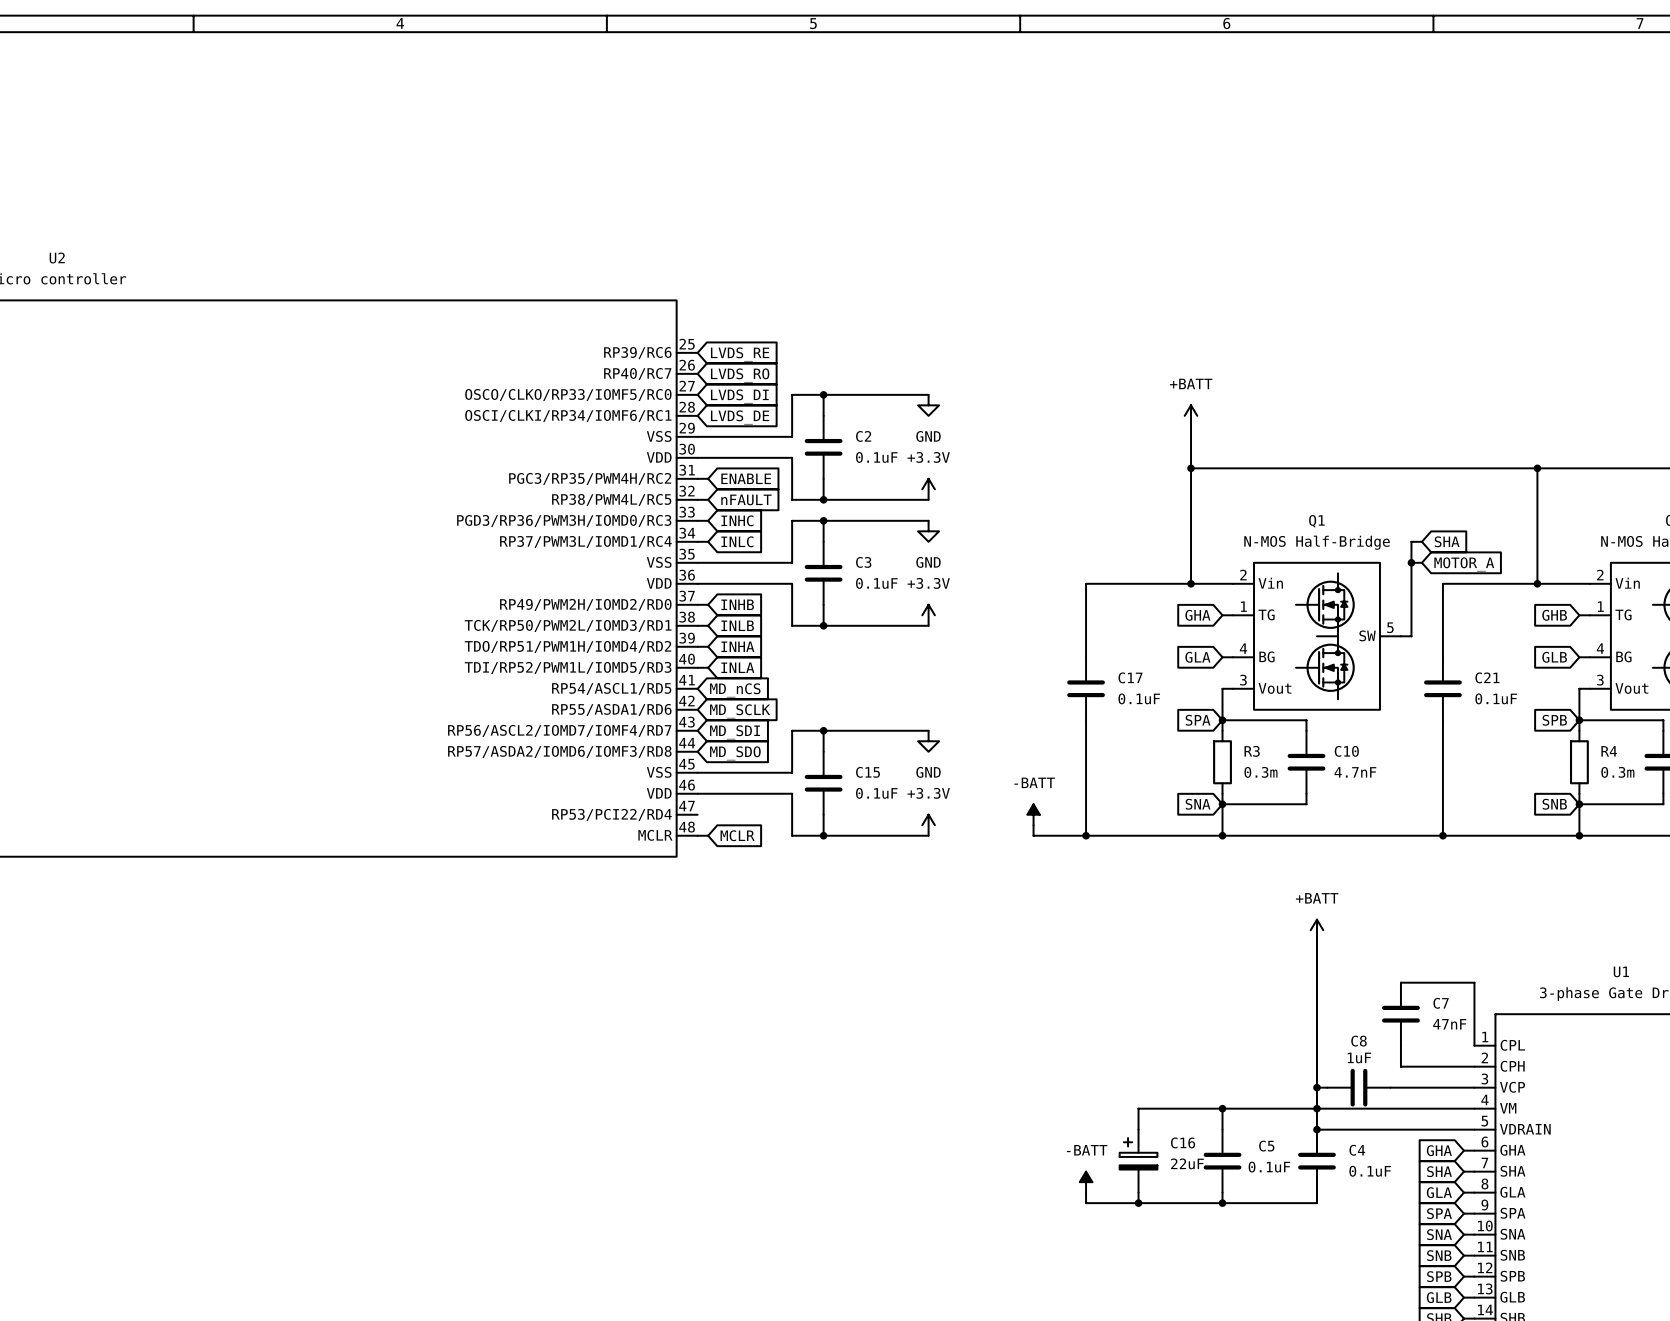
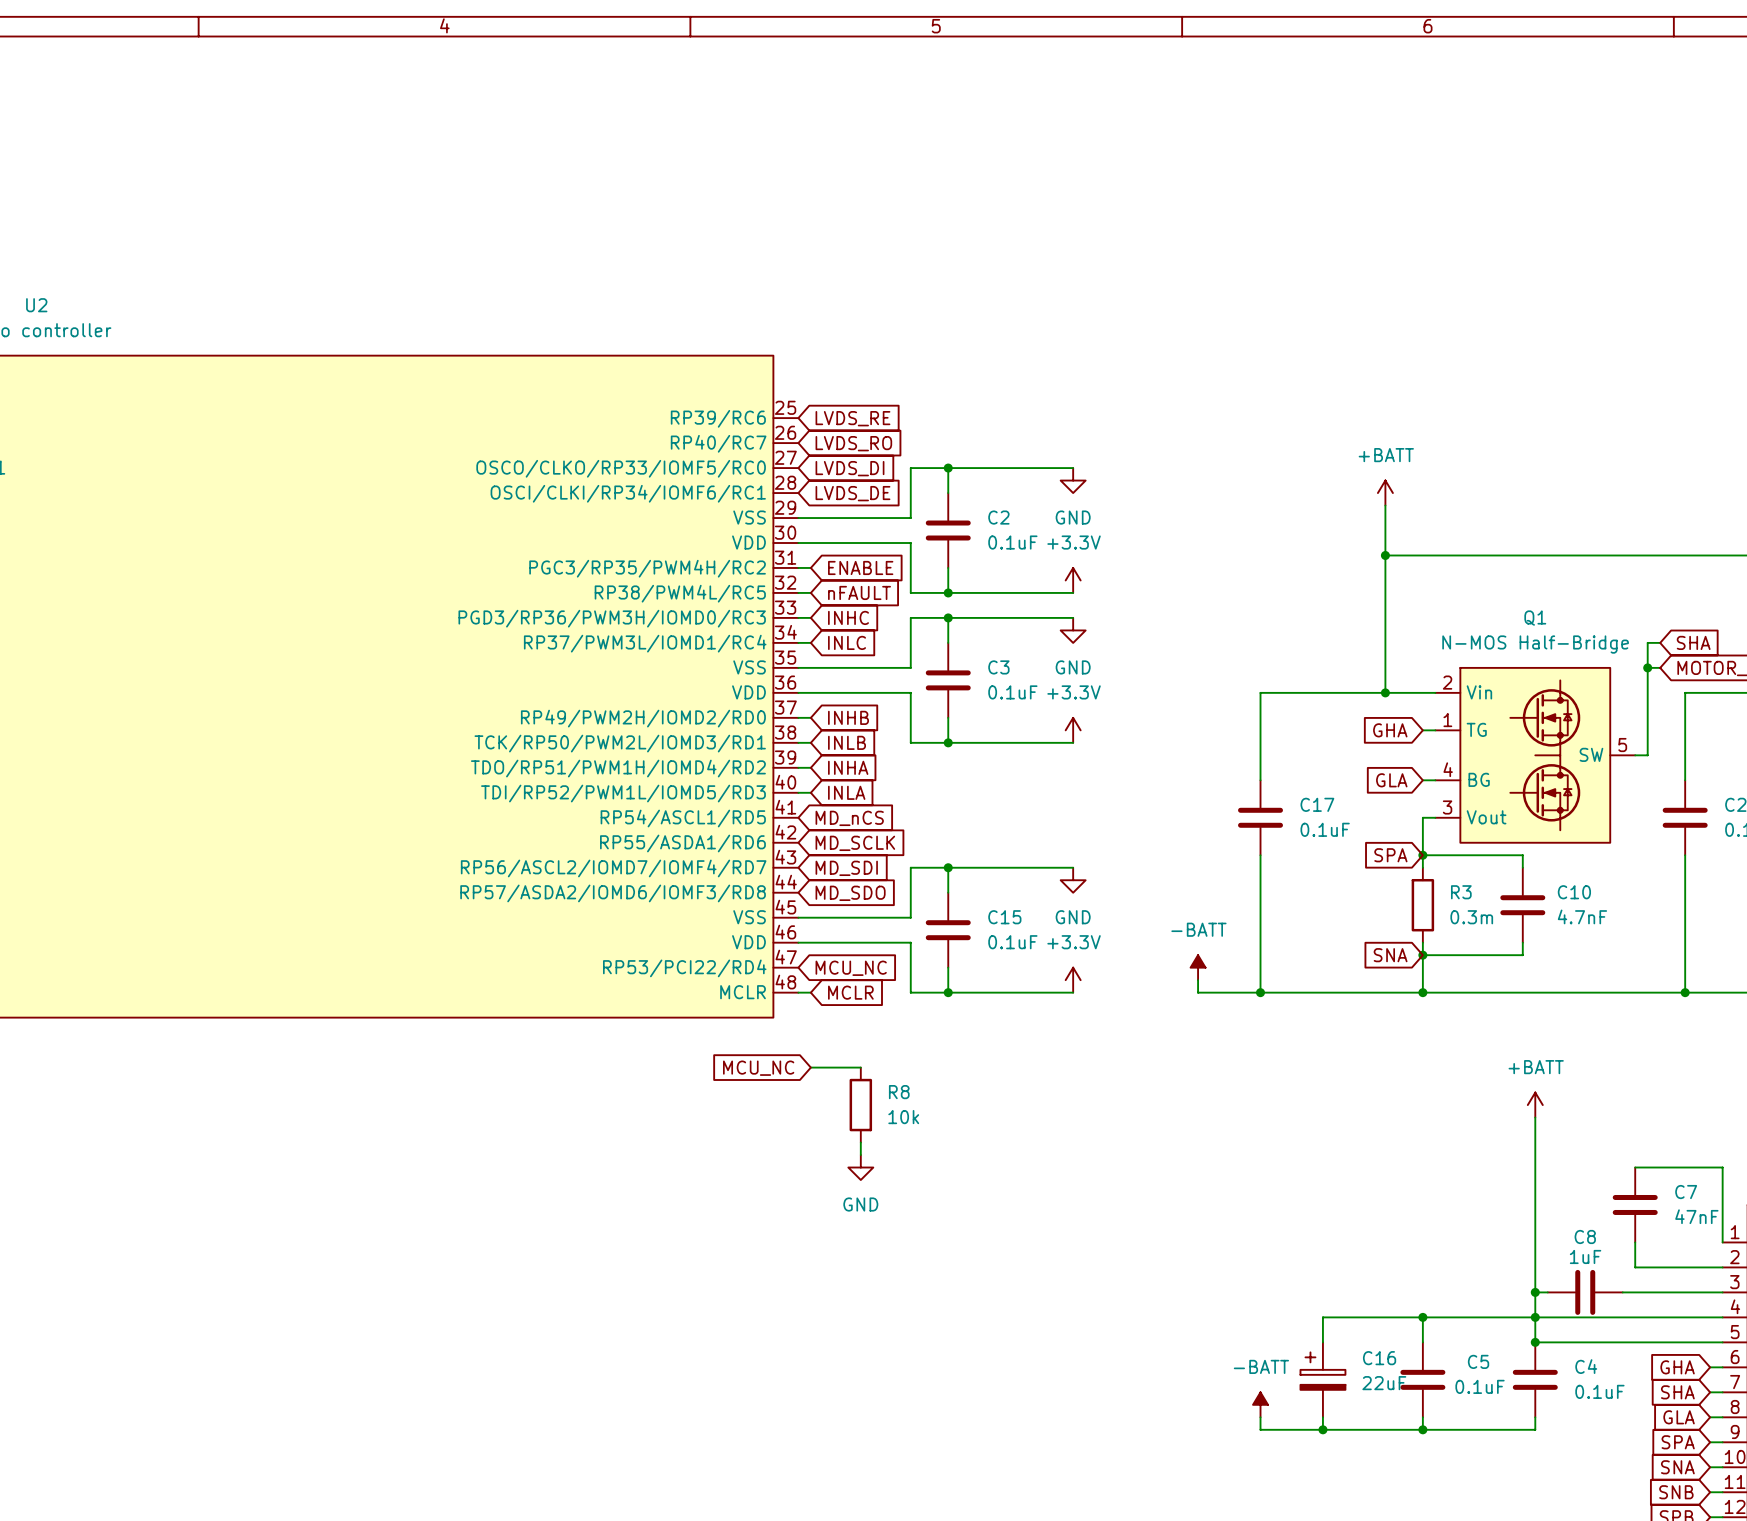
global label: none -> MCU_NC (851, 968)
wire: none -> (810, 1067) (860, 1067)
global label: none -> MCU_NC (758, 1068)
R8: none -> 10k (860, 1105)
wire: none -> (860, 1142) (860, 1155)
power symbol: none -> GND (860, 1167)

